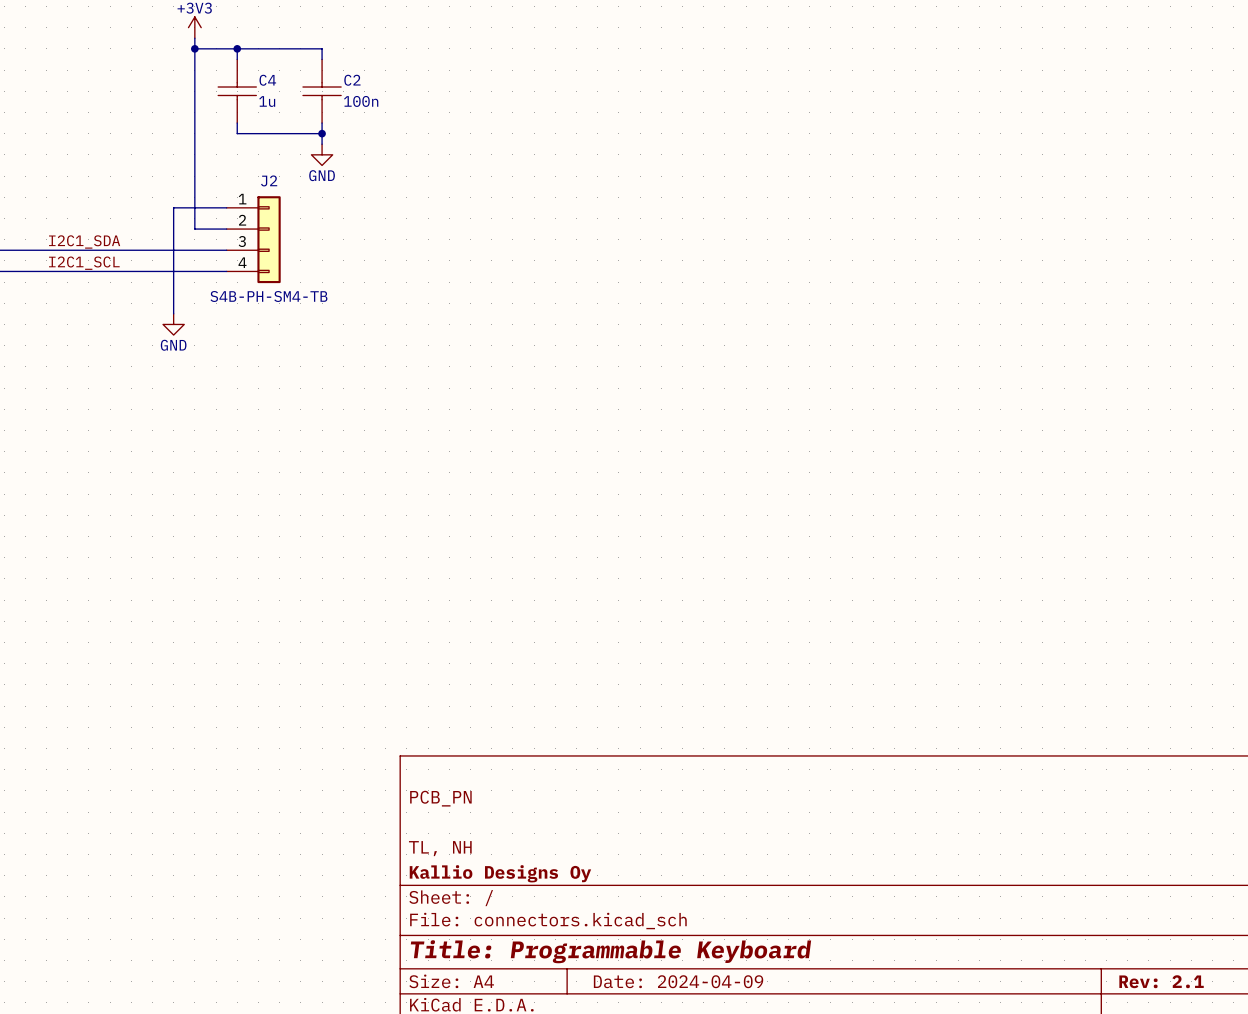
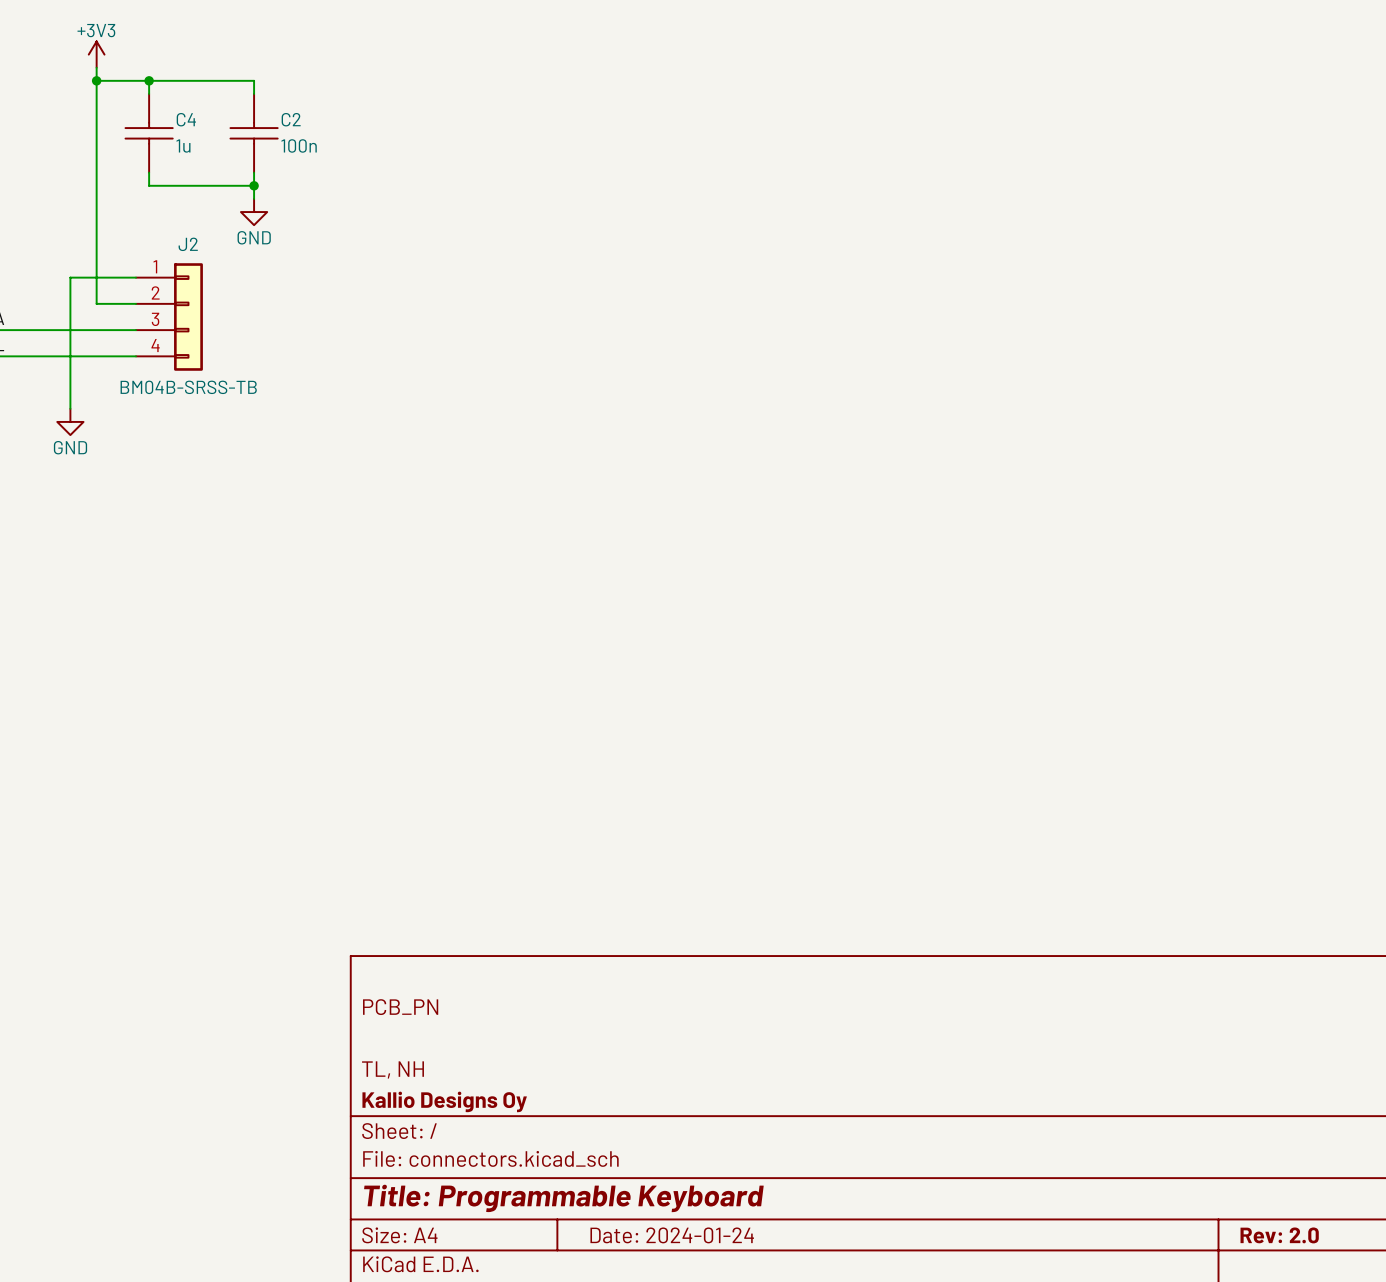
J2 value: S4B-PH-SM4-TB (268, 296) -> BM04B-SRSS-TB (188, 387)
title block: Date: 2024-04-09 (678, 981) -> Date: 2024-01-24 (672, 1235)
title block: Rev: 2.1 (1161, 981) -> Rev: 2.0 (1279, 1235)

